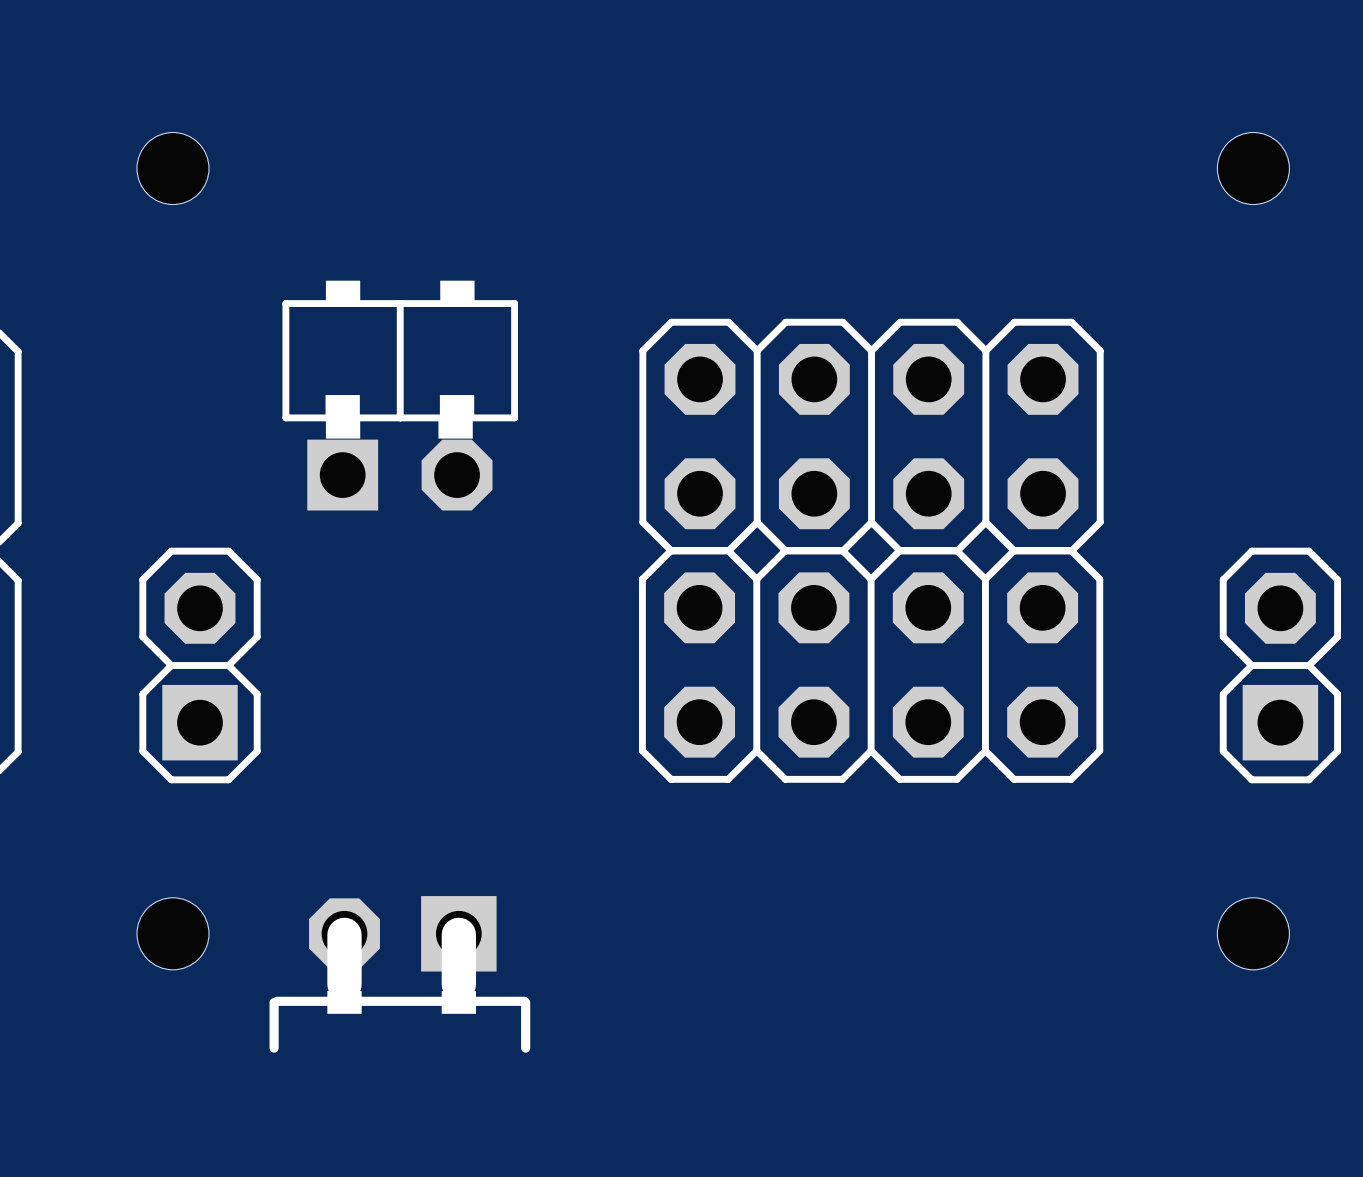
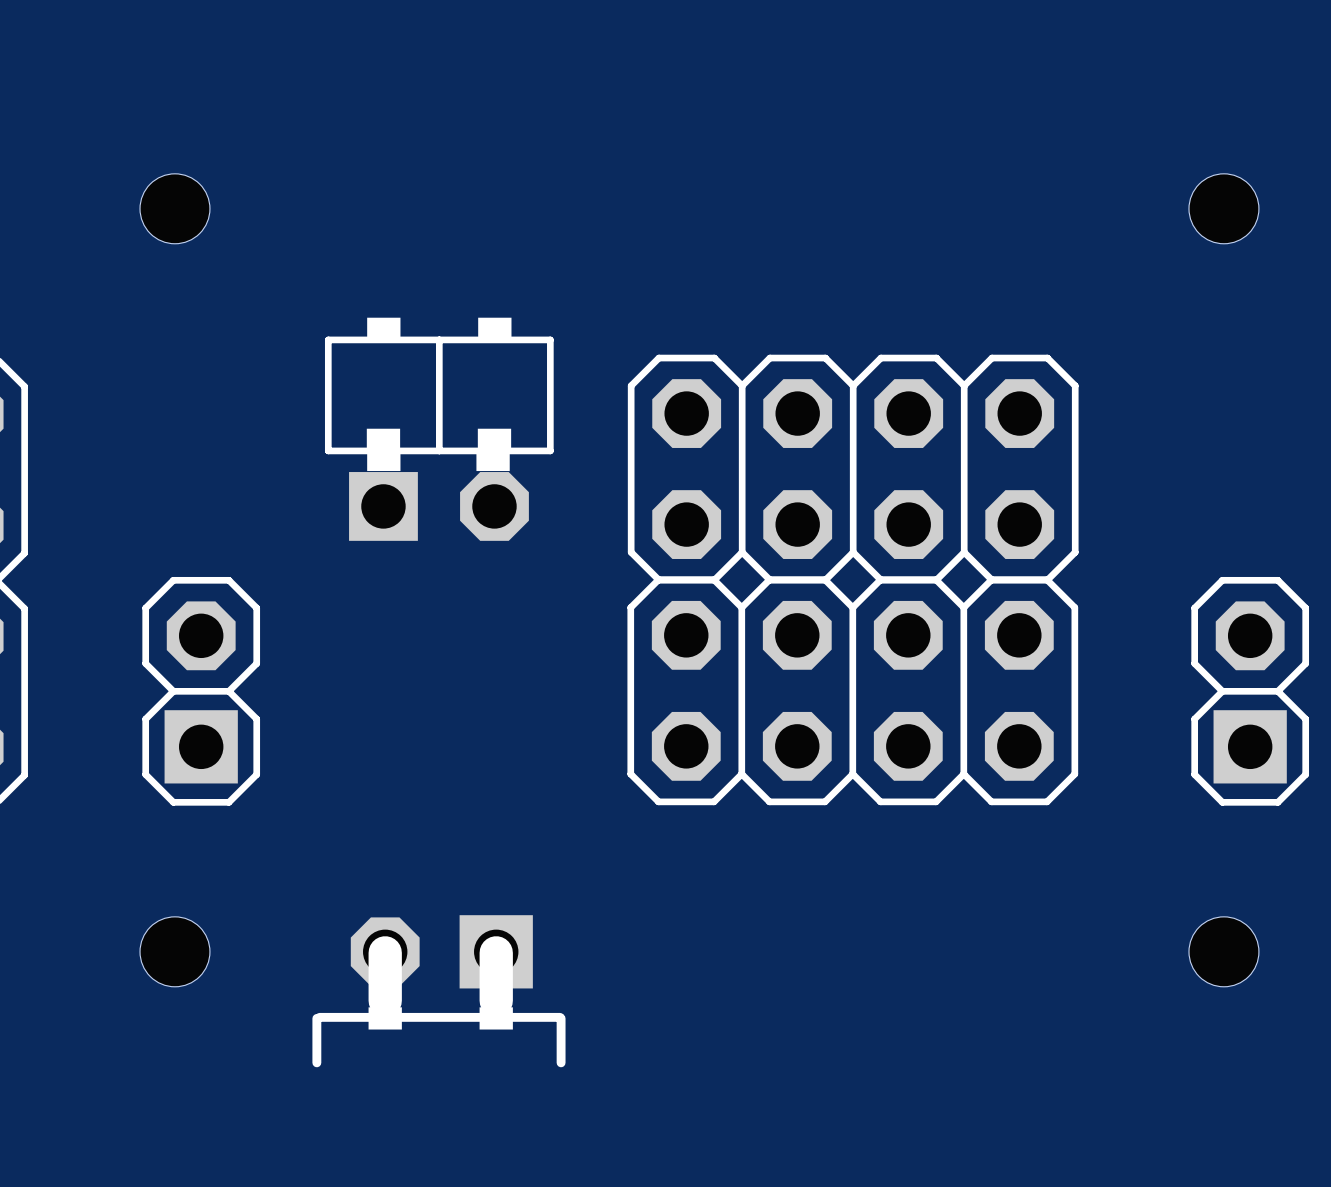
part position: (400, 395) -> (439, 429)
part position: (399, 974) -> (438, 991)

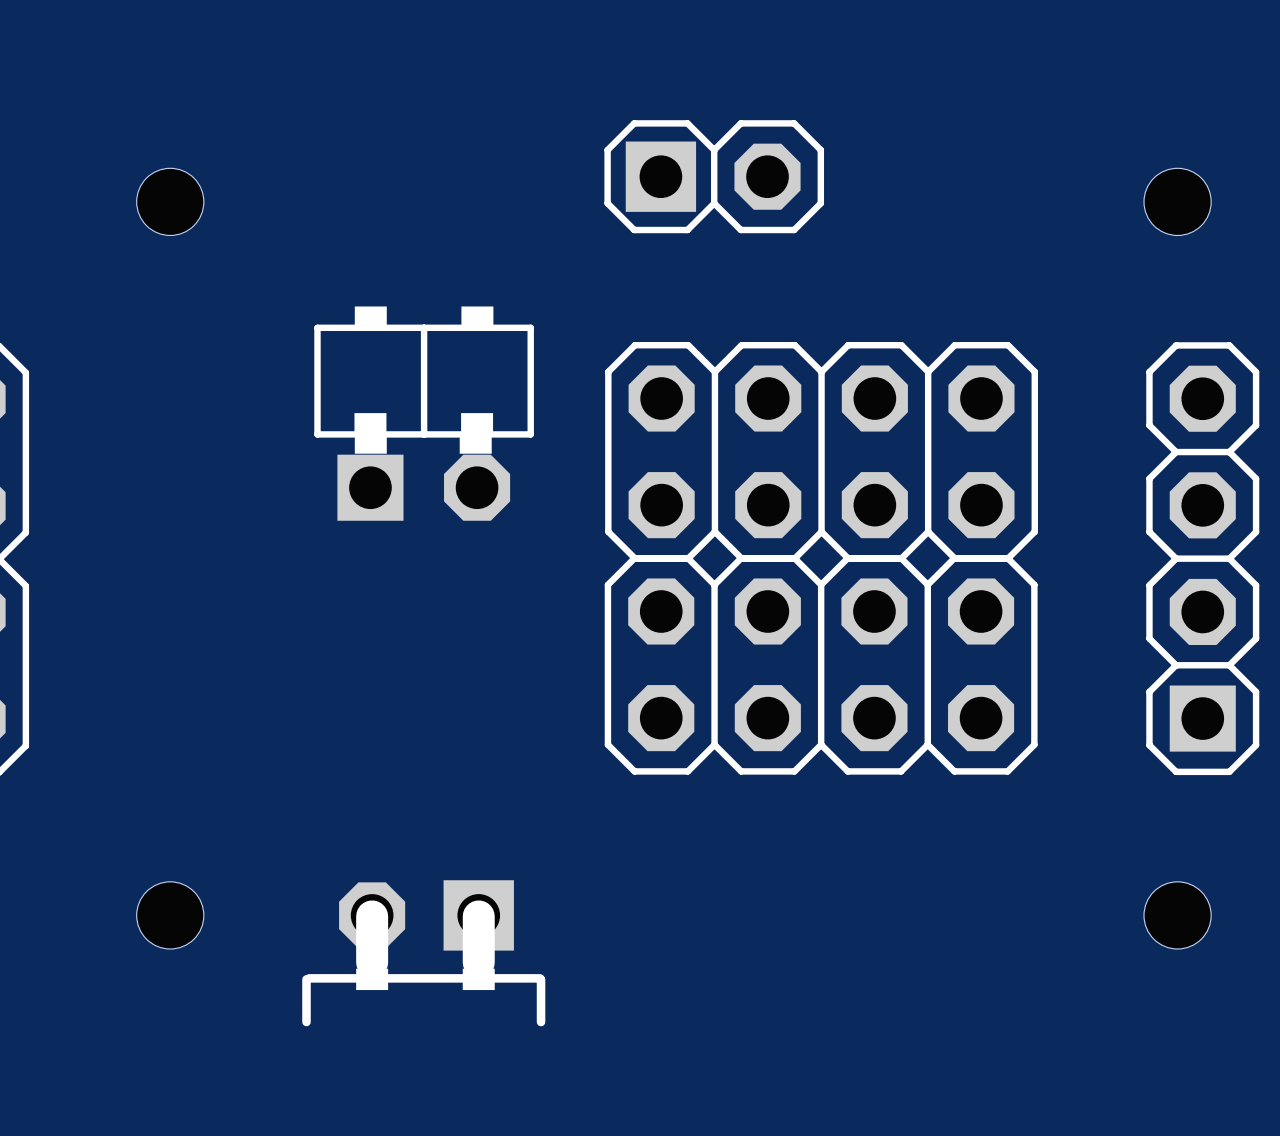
part: none -> (714, 176)
part: none -> (1202, 558)
part: (201, 691) -> none
part: (1250, 691) -> none

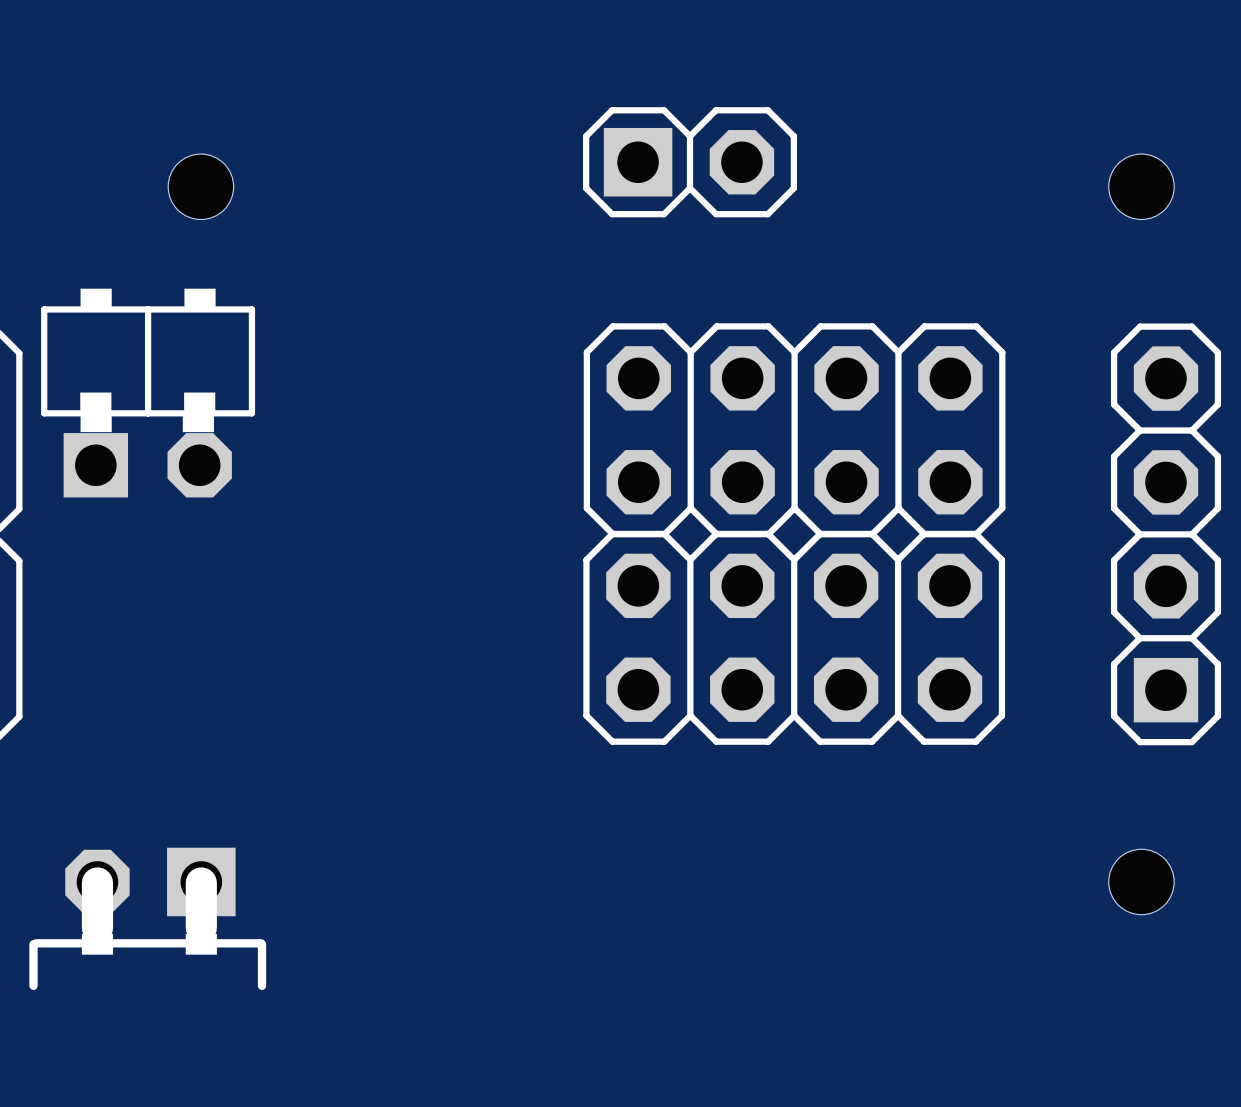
hole position: (170, 201) -> (200, 186)
part position: (424, 413) -> (148, 393)
hole: (170, 915) -> none
part position: (423, 953) -> (147, 918)

